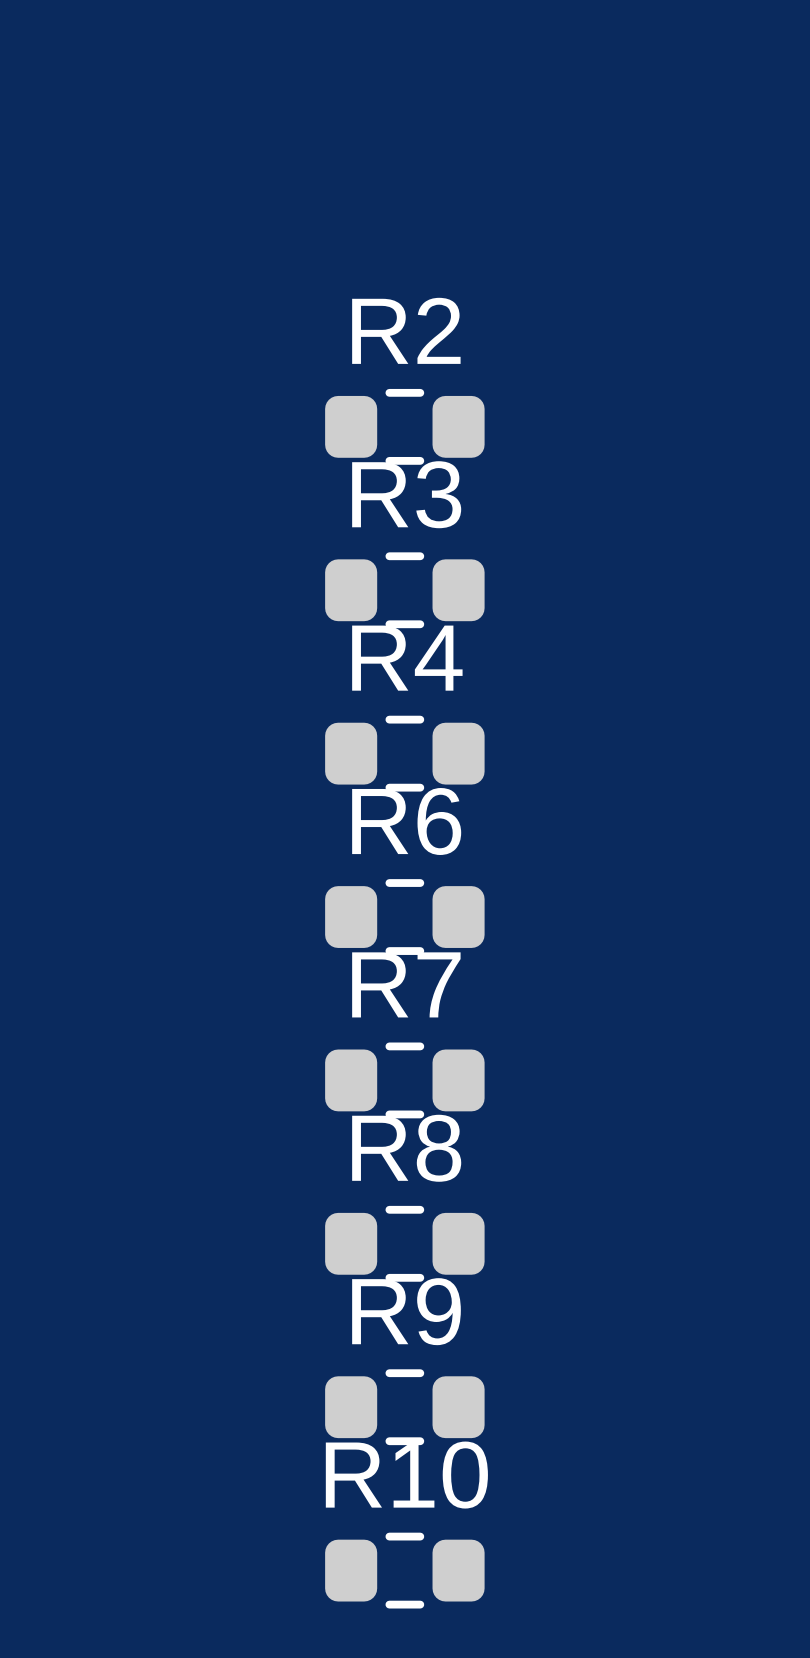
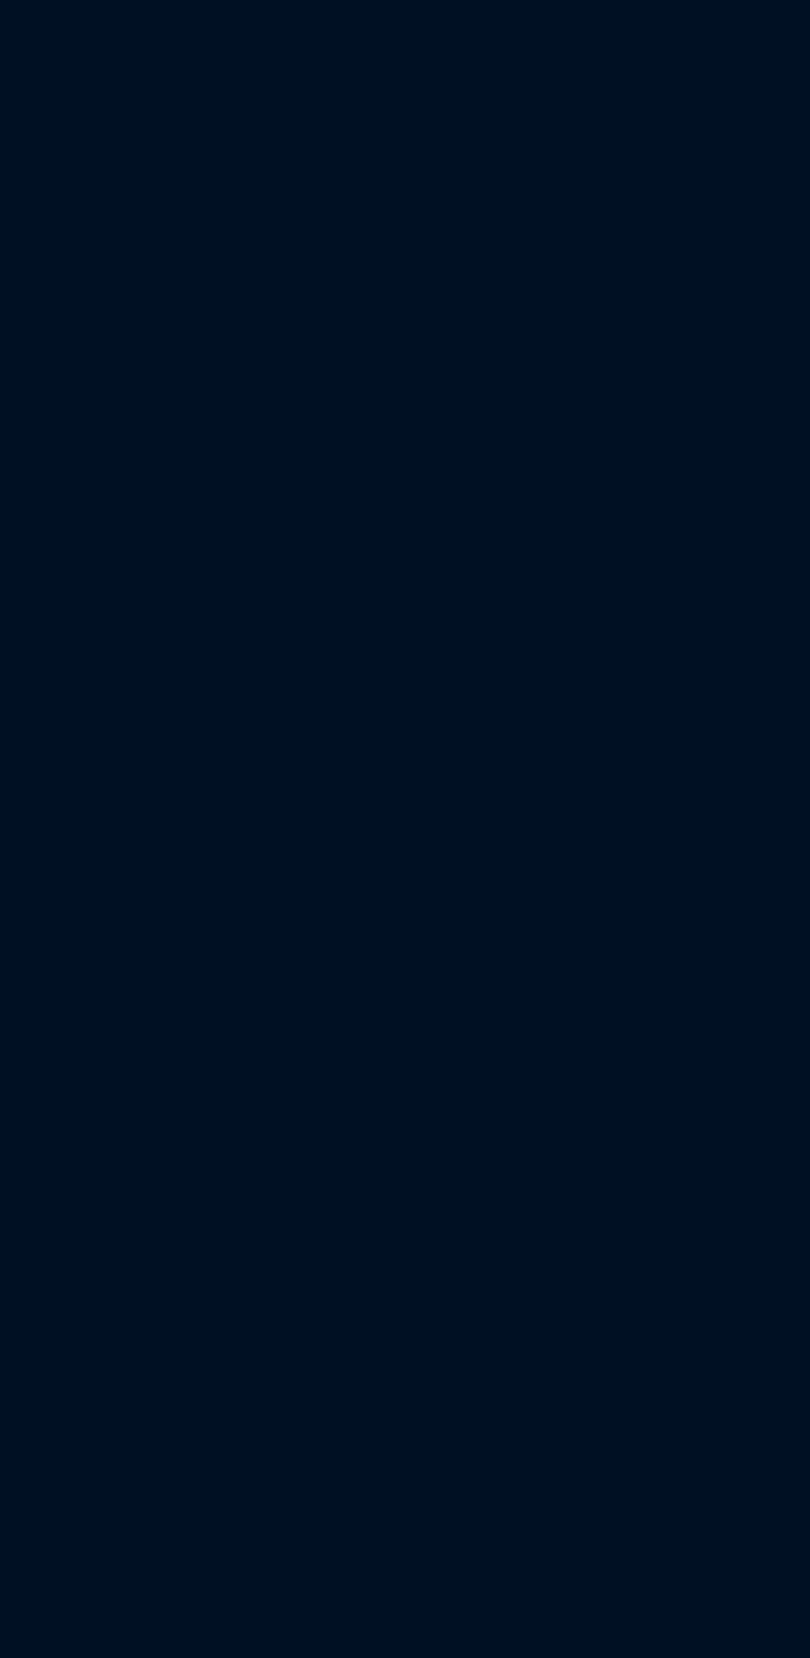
R2: (404, 426) -> none
R3: (404, 590) -> none
R4: (404, 753) -> none
R6: (404, 917) -> none
R7: (404, 1080) -> none
R8: (404, 1243) -> none
R9: (404, 1407) -> none
R10: (404, 1570) -> none

